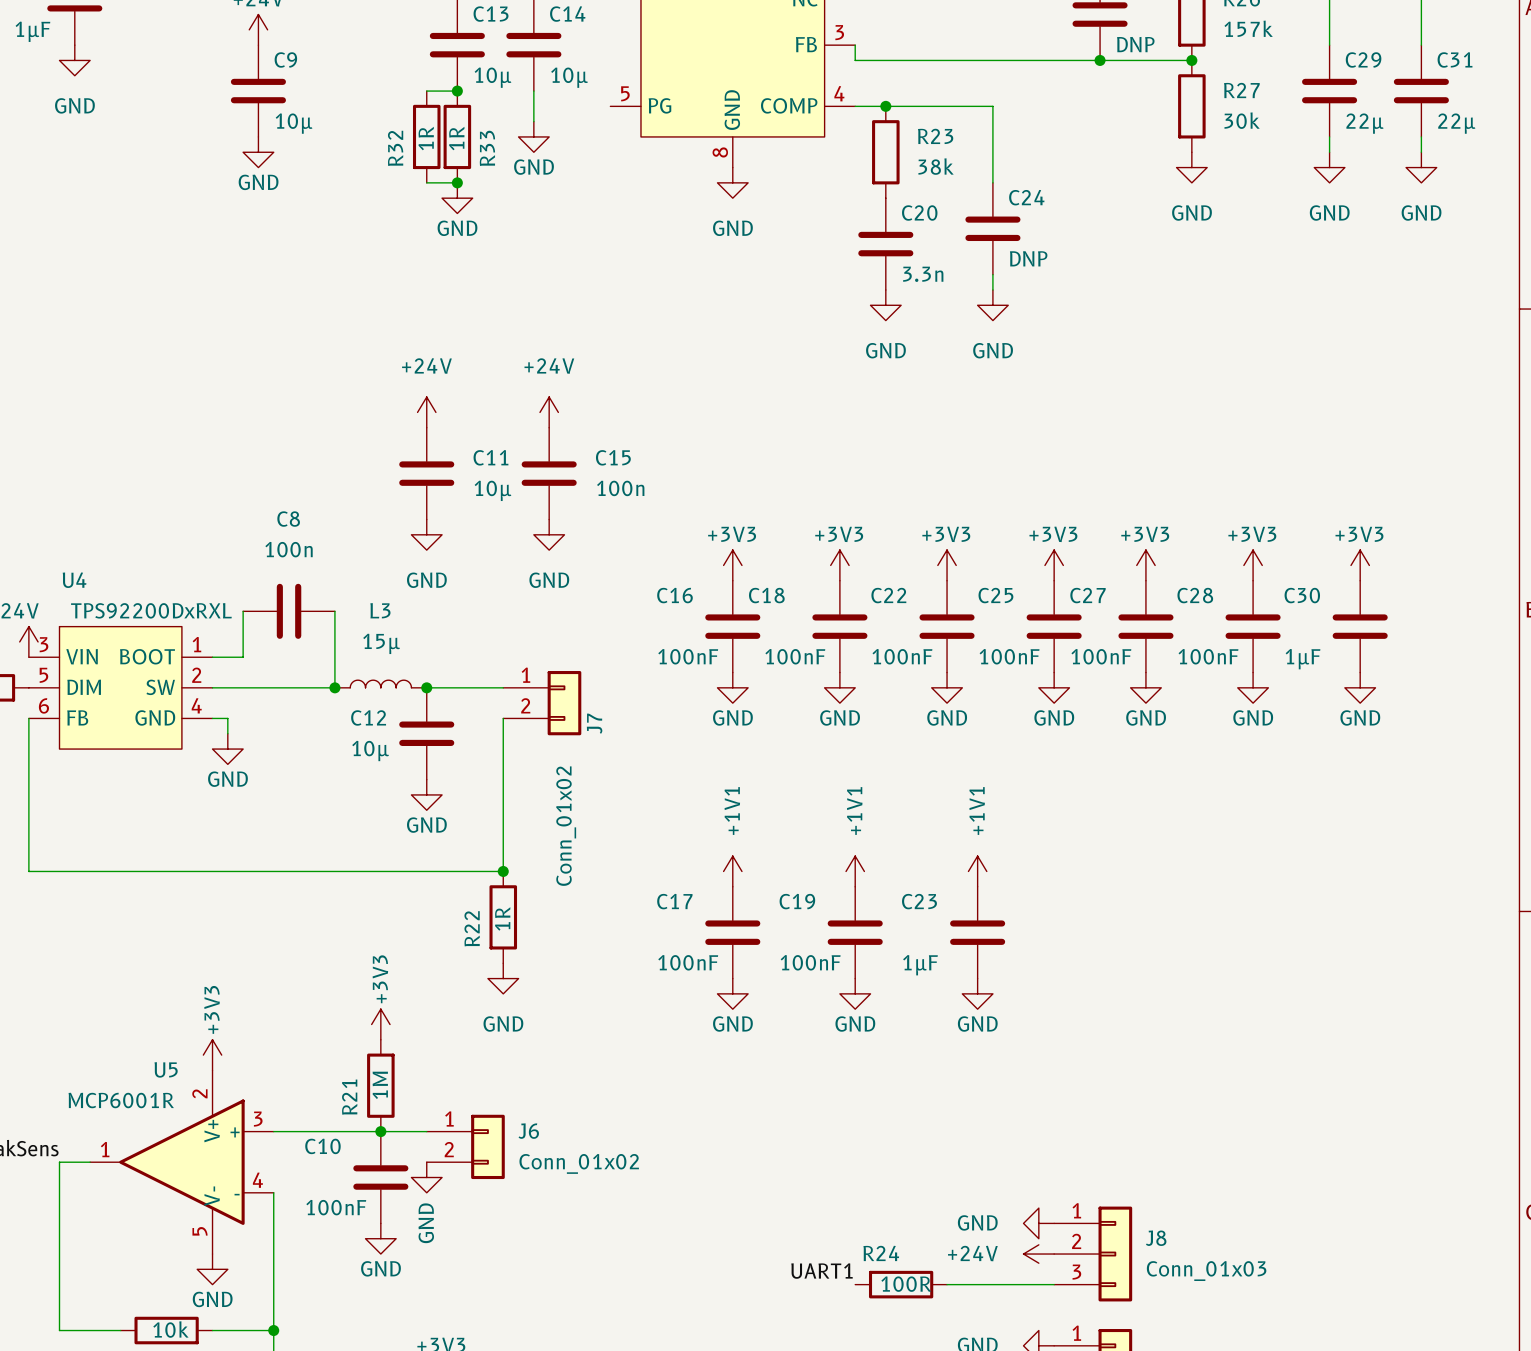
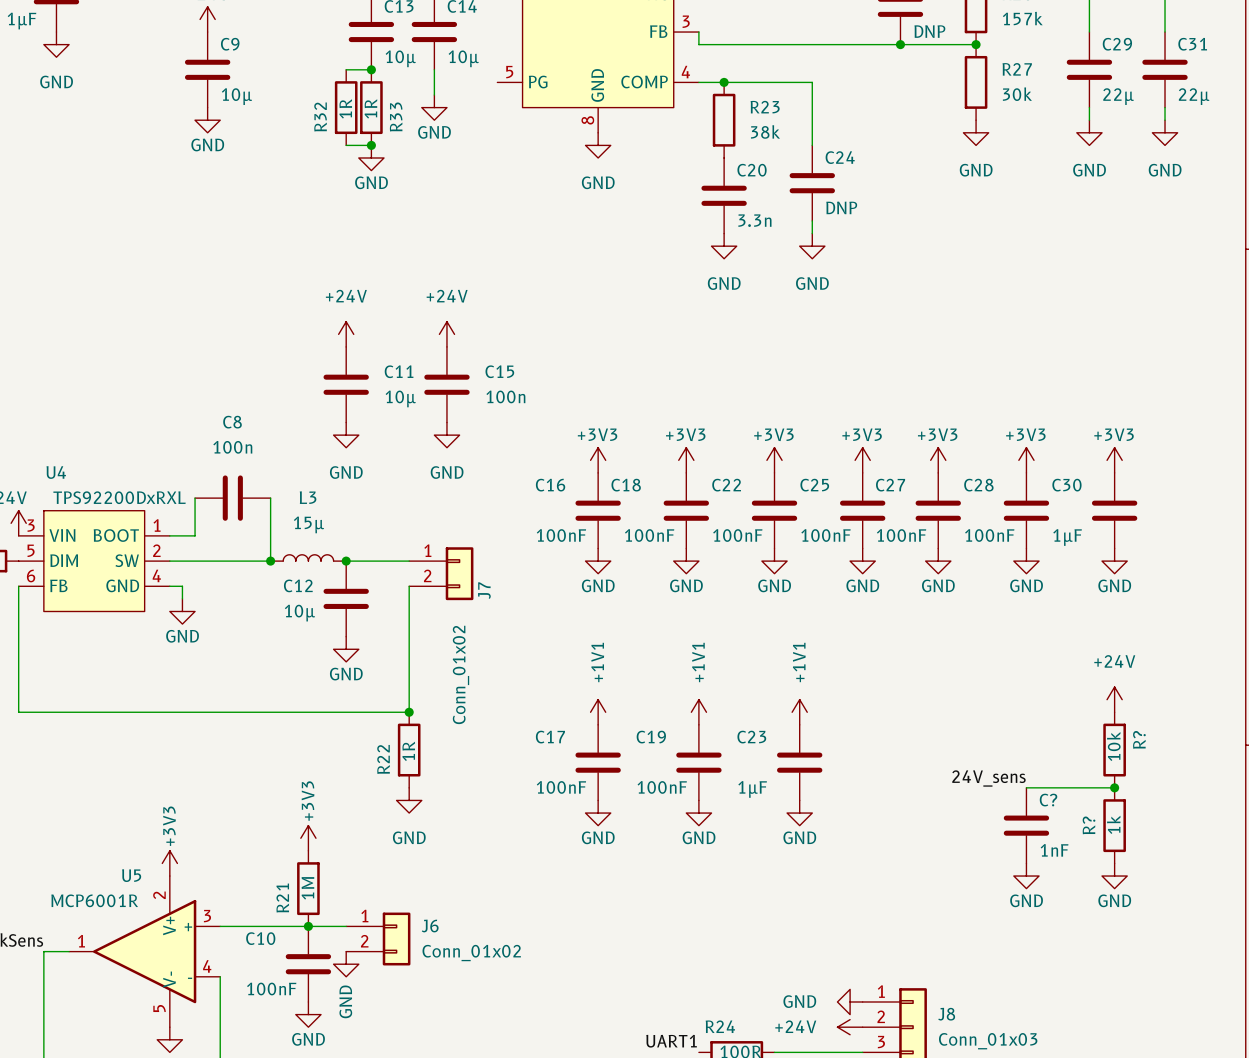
power symbol: none -> +24V (1114, 699)
R?: none -> 10k (1114, 750)
label: none -> 24V_sens (988, 778)
wire: none -> (1026, 787) (1114, 787)
junction: none -> (1114, 787)
C?: none -> 1nF (1026, 825)
R?: none -> 1k (1114, 825)
power symbol: none -> GND (1026, 876)
power symbol: none -> GND (1114, 876)

